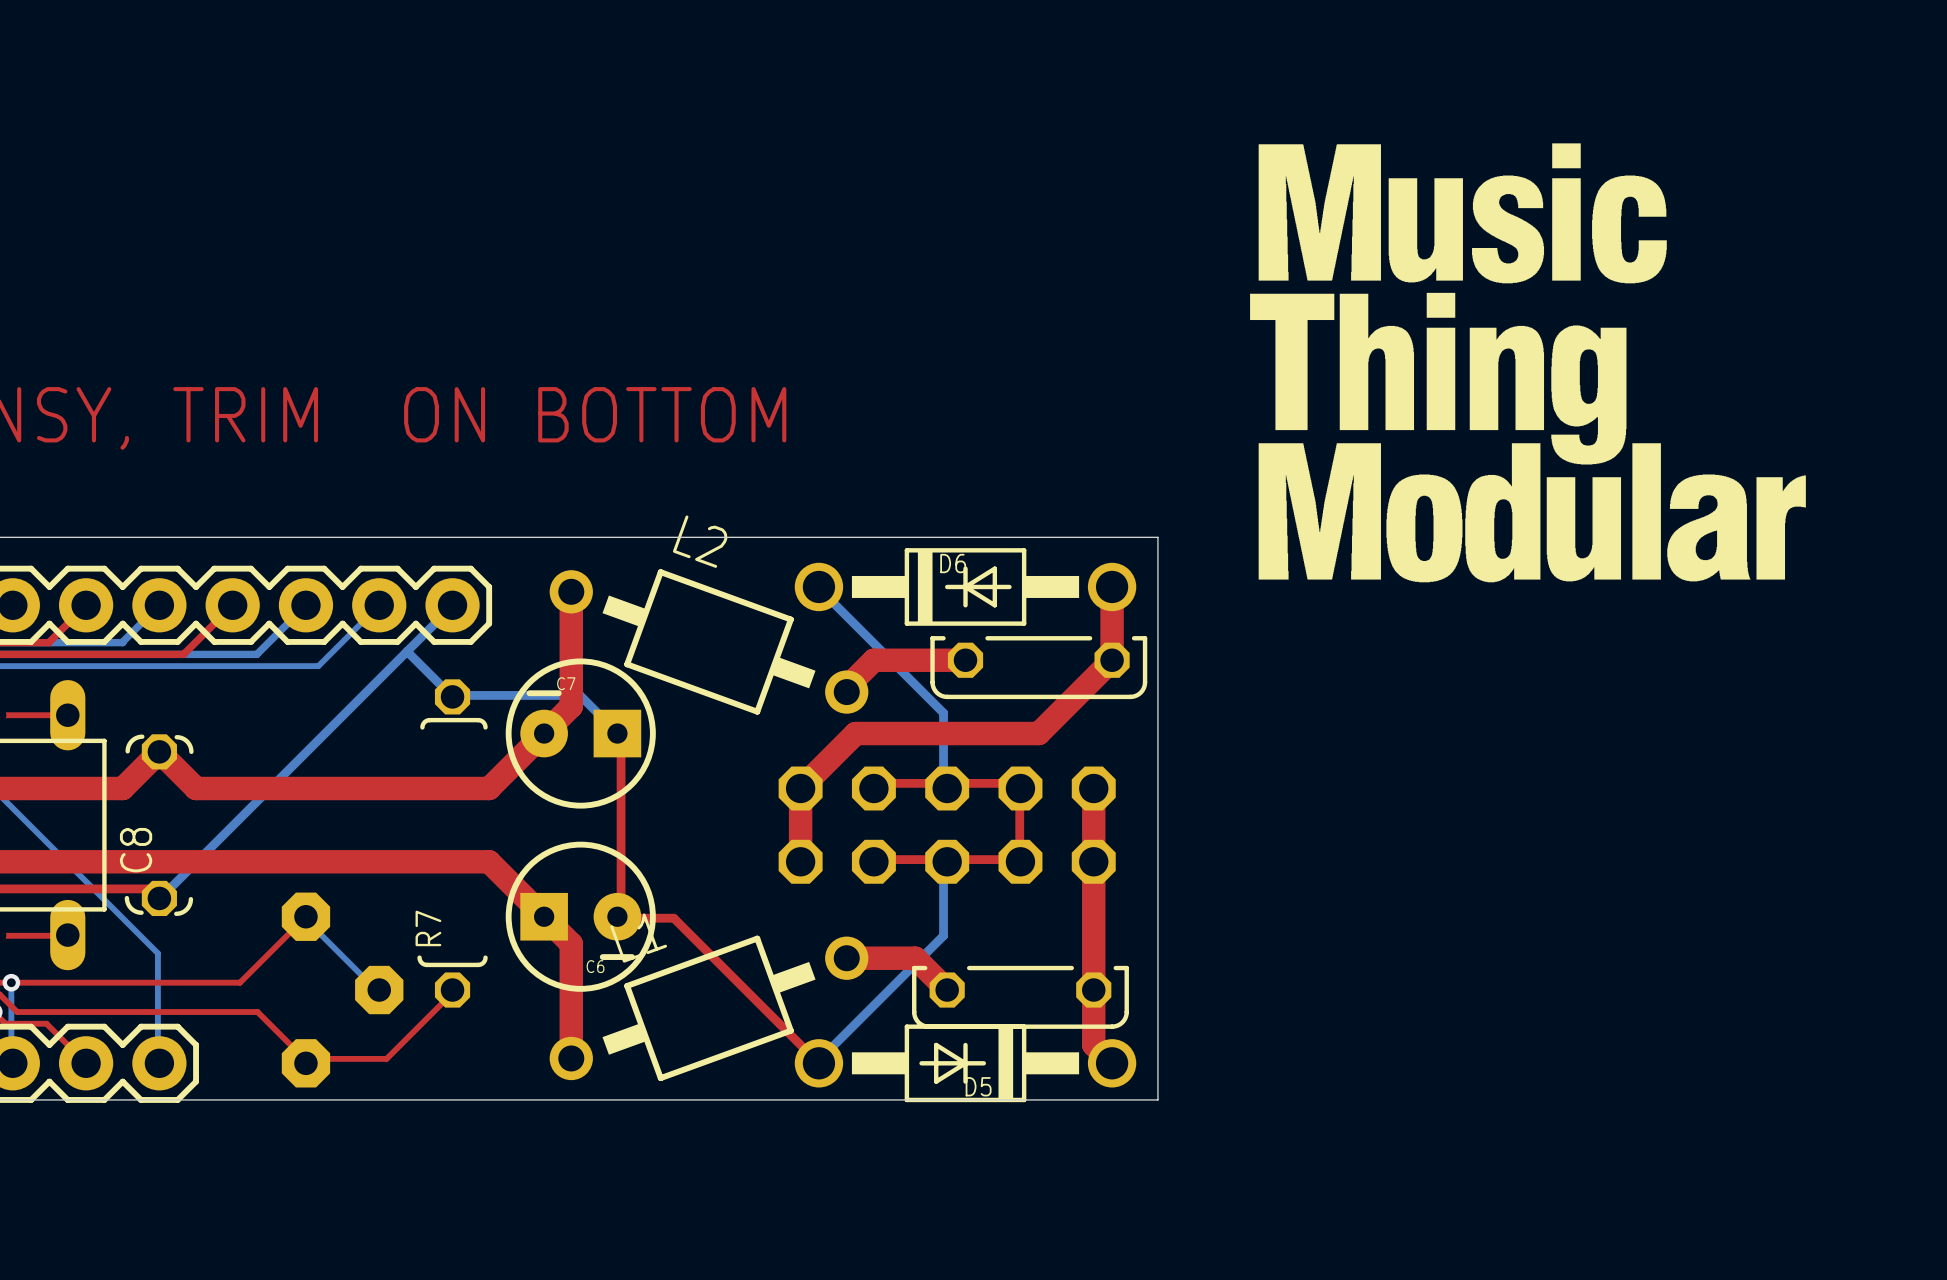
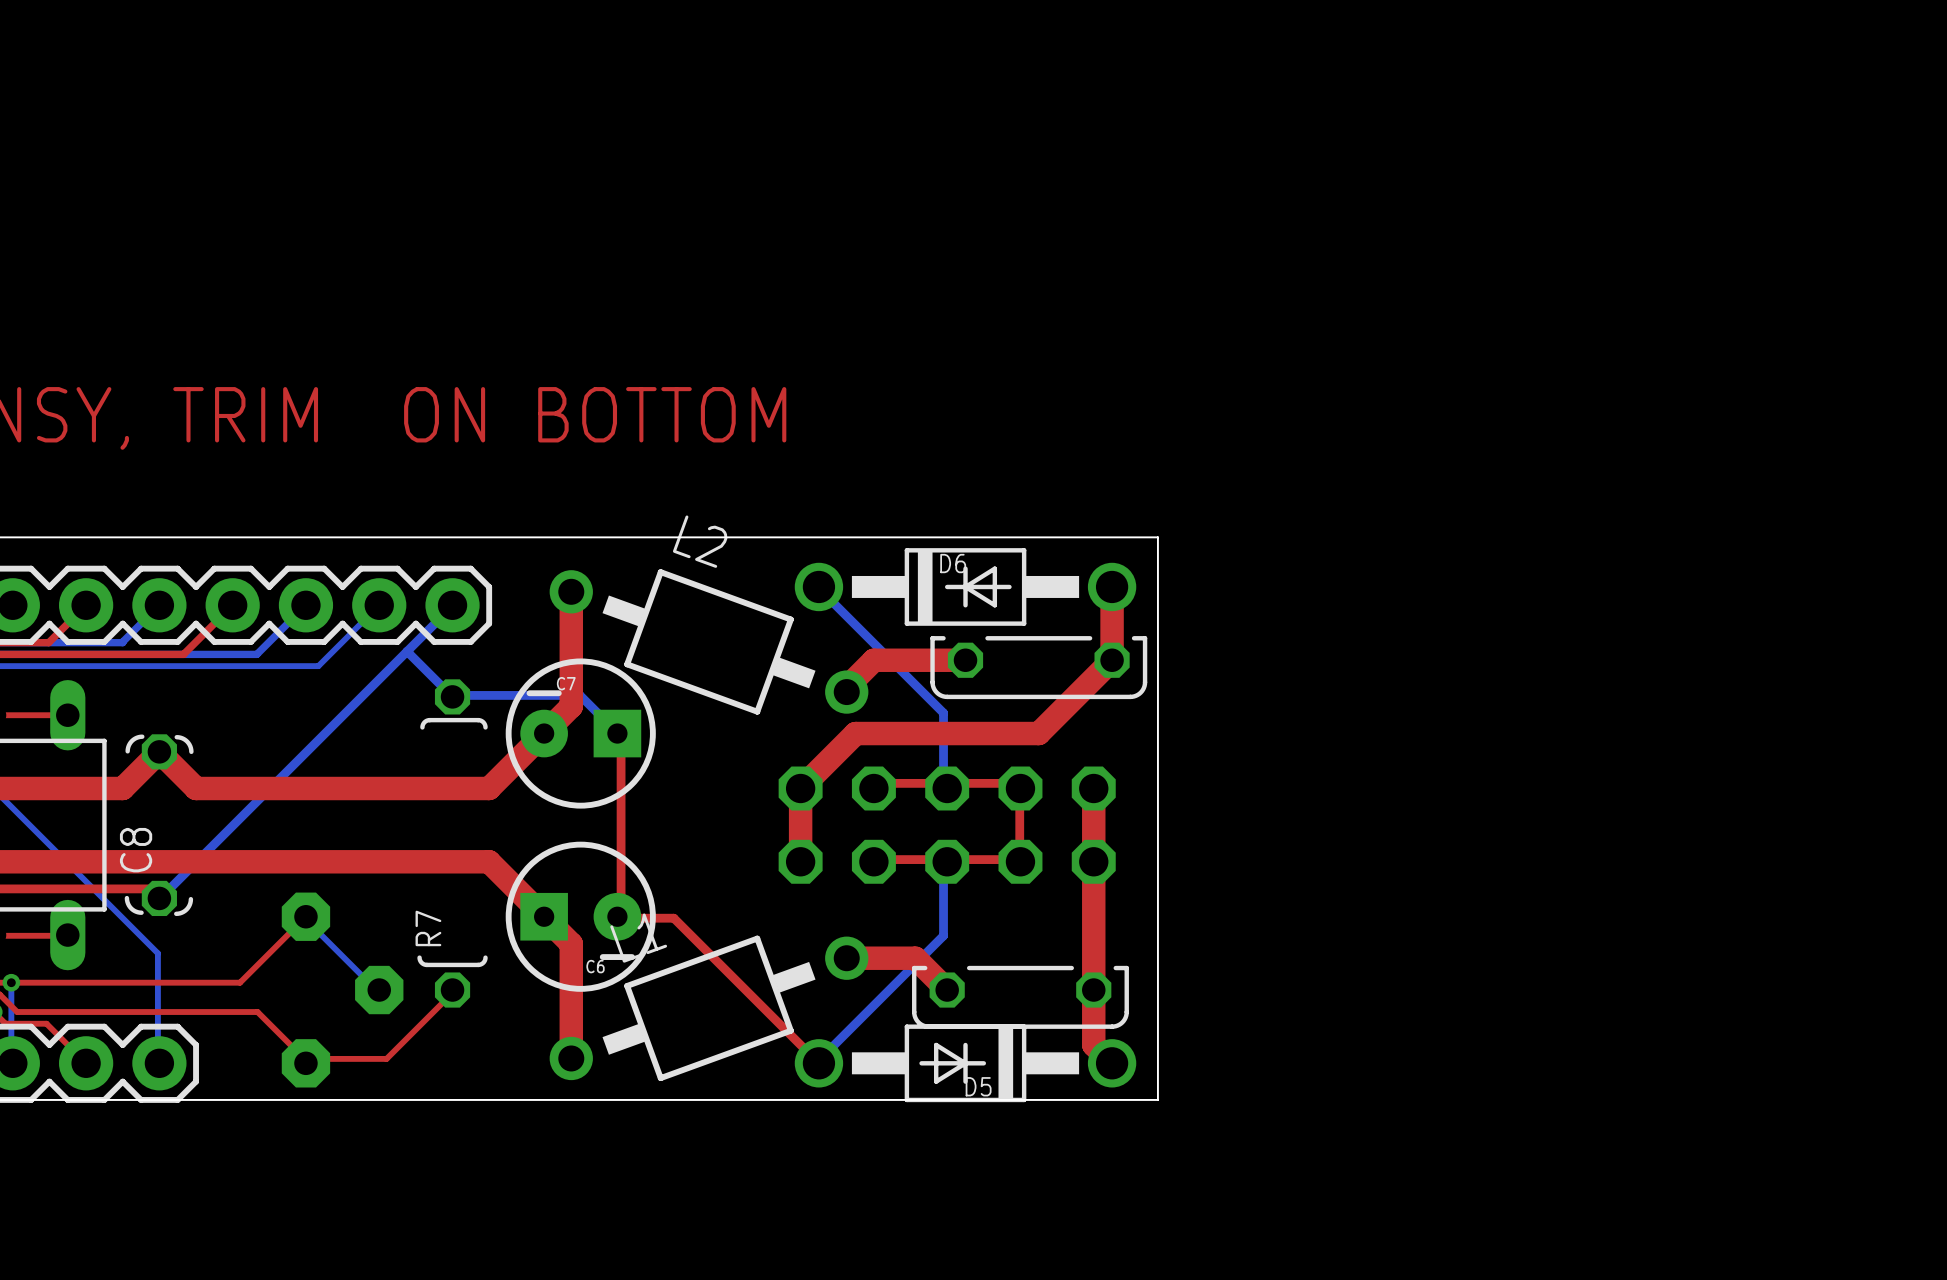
drawing: [1250, 143, 1806, 583] -> none

